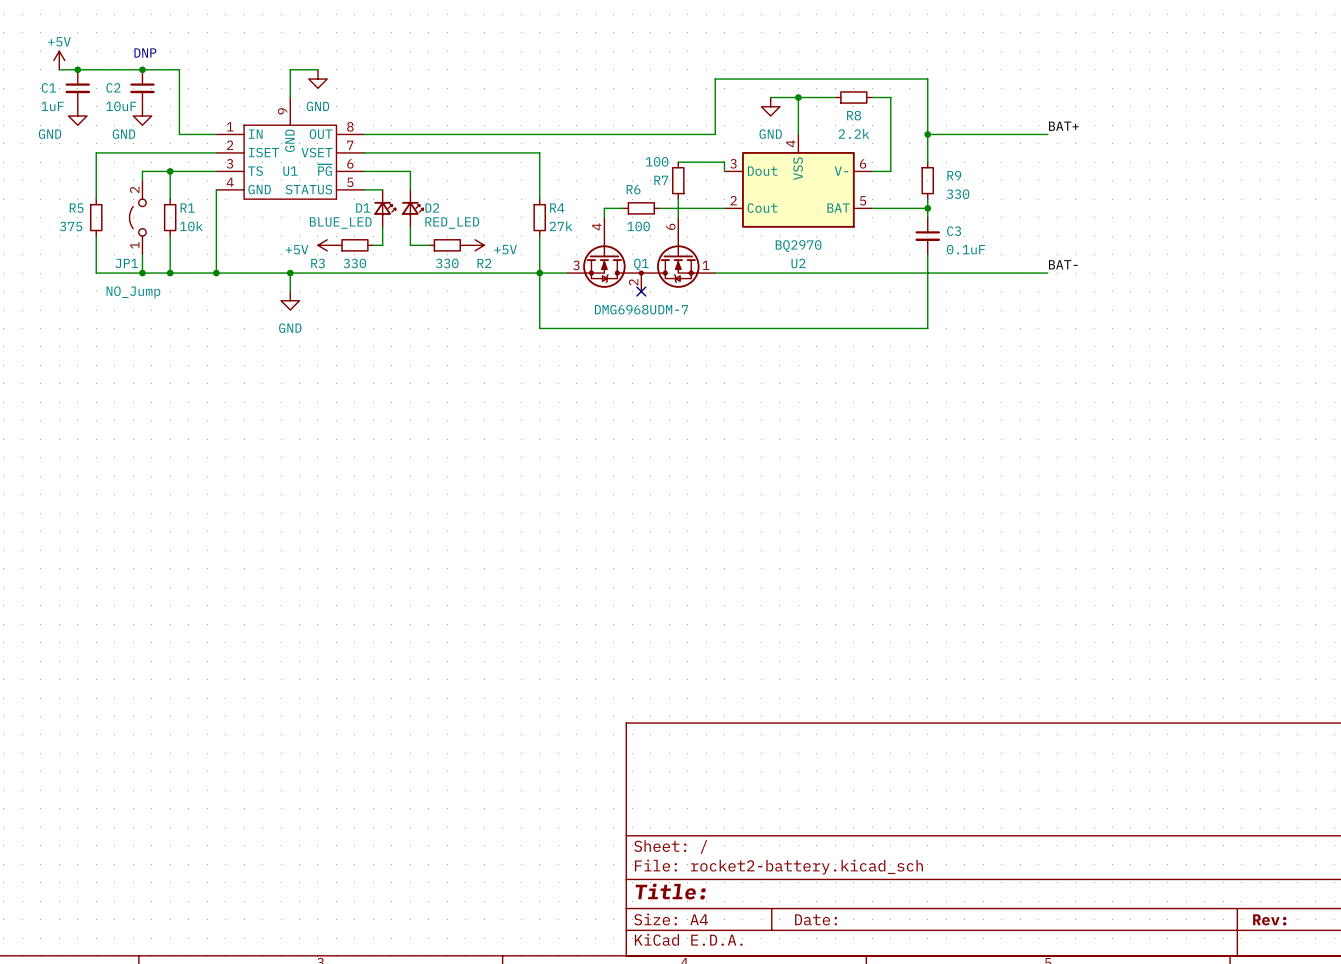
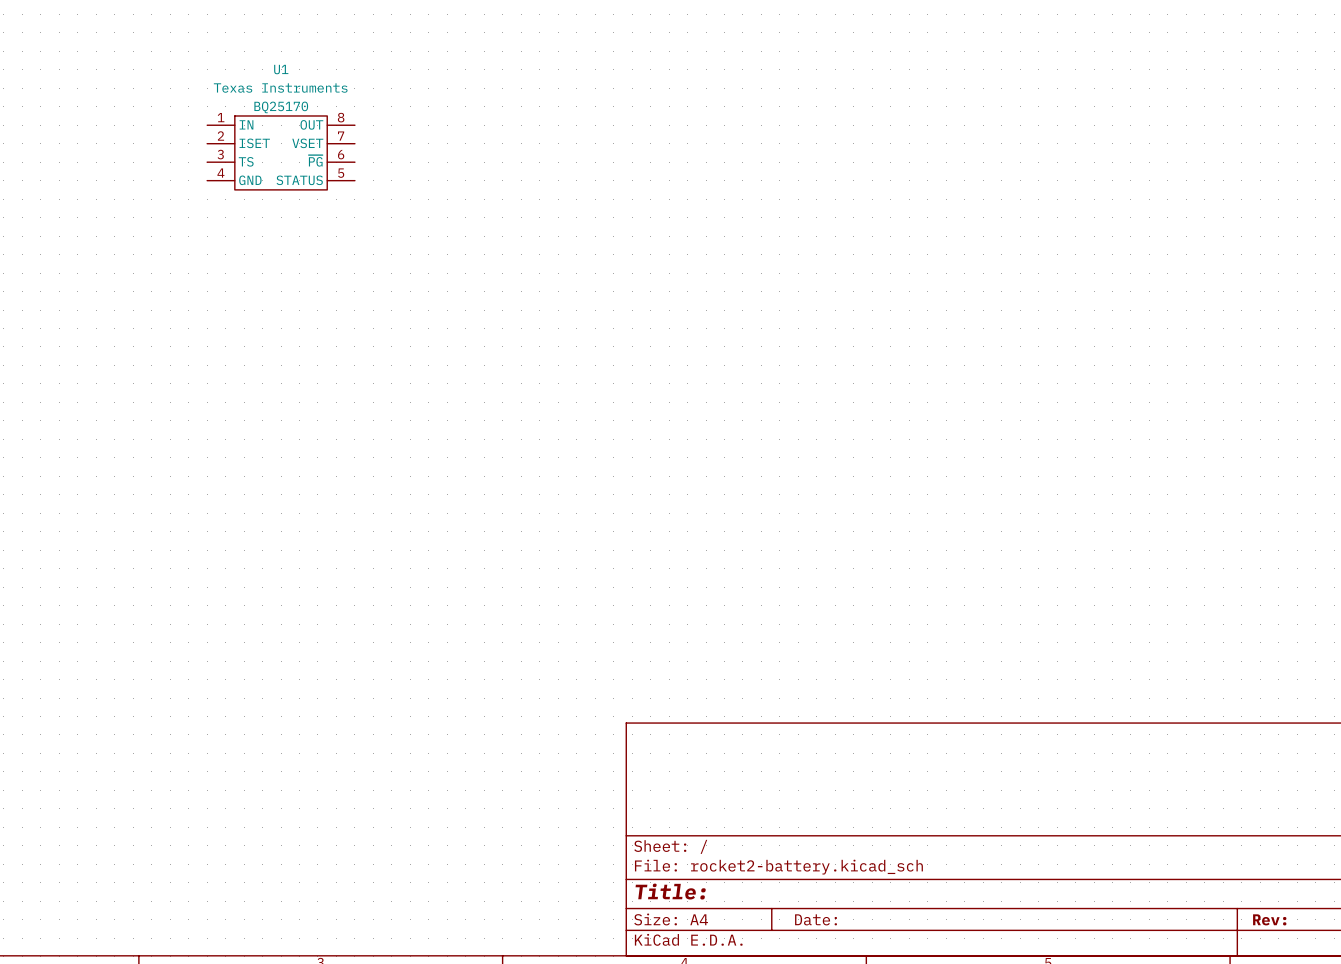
text: DNP (145, 52) -> none
power symbol: +5V (59, 60) -> none
wire: (59, 69) (179, 69) (179, 134) (216, 134) -> none
junction: (77, 69) -> none
junction: (142, 69) -> none
wire: (317, 69) (290, 69) (290, 97) -> none
power symbol: GND (317, 79) -> none
C1: 1uF (77, 88) -> none
C2: 10uF (142, 88) -> none
U1 text: none -> Texas Instruments (280, 88)
U1 symbol: [216, 97, 365, 200] -> [207, 115, 355, 190]
wire: (770, 97) (835, 97) -> none
wire: (798, 97) (798, 134) -> none
junction: (798, 97) -> none
R8: 2.2k (853, 97) -> none
wire: (872, 97) (890, 97) (890, 171) (872, 171) -> none
power symbol: GND (770, 106) -> none
U1 text: none -> BQ25170 (281, 107)
power symbol: GND (77, 115) -> none
power symbol: GND (142, 115) -> none
label: BAT+ (1063, 126) -> none
wire: (364, 134) (715, 134) (715, 79) (927, 79) (927, 162) -> none
wire: (927, 134) (1047, 134) -> none
junction: (927, 134) -> none
wire: (216, 152) (96, 152) (96, 199) -> none
wire: (364, 152) (539, 152) (539, 199) -> none
wire: (678, 162) (724, 162) (724, 171) -> none
wire: (170, 171) (170, 199) -> none
junction: (170, 171) -> none
wire: (216, 171) (142, 171) (142, 180) -> none
U1 name position: U1 (290, 171) -> U1 (281, 69)
wire: (364, 171) (410, 171) (410, 189) -> none
R7: 100 (678, 180) -> none
R9: 330 (927, 180) -> none
U2: BQ2970 (798, 181) -> none
wire: (216, 189) (216, 273) -> none
wire: (364, 189) (382, 189) -> none
wire: (678, 199) (678, 217) -> none
wire: (927, 199) (927, 217) -> none
D1: BLUE_LED (384, 208) -> none
D2: RED_LED (412, 208) -> none
wire: (622, 208) (604, 208) (604, 217) -> none
R6: 100 (641, 208) -> none
wire: (659, 208) (724, 208) -> none
wire: (872, 208) (927, 208) -> none
junction: (927, 208) -> none
R5: 375 (96, 217) -> none
JP1: NO_Jump (137, 217) -> none
R1: 10k (170, 217) -> none
R4: 27k (539, 217) -> none
wire: (382, 226) (382, 245) (373, 245) -> none
wire: (410, 226) (410, 245) (428, 245) -> none
wire: (96, 236) (96, 273) (567, 273) -> none
wire: (170, 236) (170, 273) -> none
wire: (539, 236) (539, 328) (927, 328) (927, 254) -> none
C3: 0.1uF (927, 236) -> none
power symbol: +5V (327, 245) -> none
R3: 330 (354, 245) -> none
R2: 330 (447, 245) -> none
power symbol: +5V (475, 245) -> none
wire: (142, 254) (142, 273) -> none
Q1: DMG6968UDM-7 (641, 254) -> none
label: BAT- (1063, 264) -> none
junction: (142, 273) -> none
junction: (170, 273) -> none
junction: (216, 273) -> none
wire: (290, 273) (290, 291) -> none
junction: (290, 273) -> none
junction: (539, 273) -> none
wire: (715, 273) (1047, 273) -> none
no-connect mark: (641, 291) -> none
power symbol: GND (290, 300) -> none

